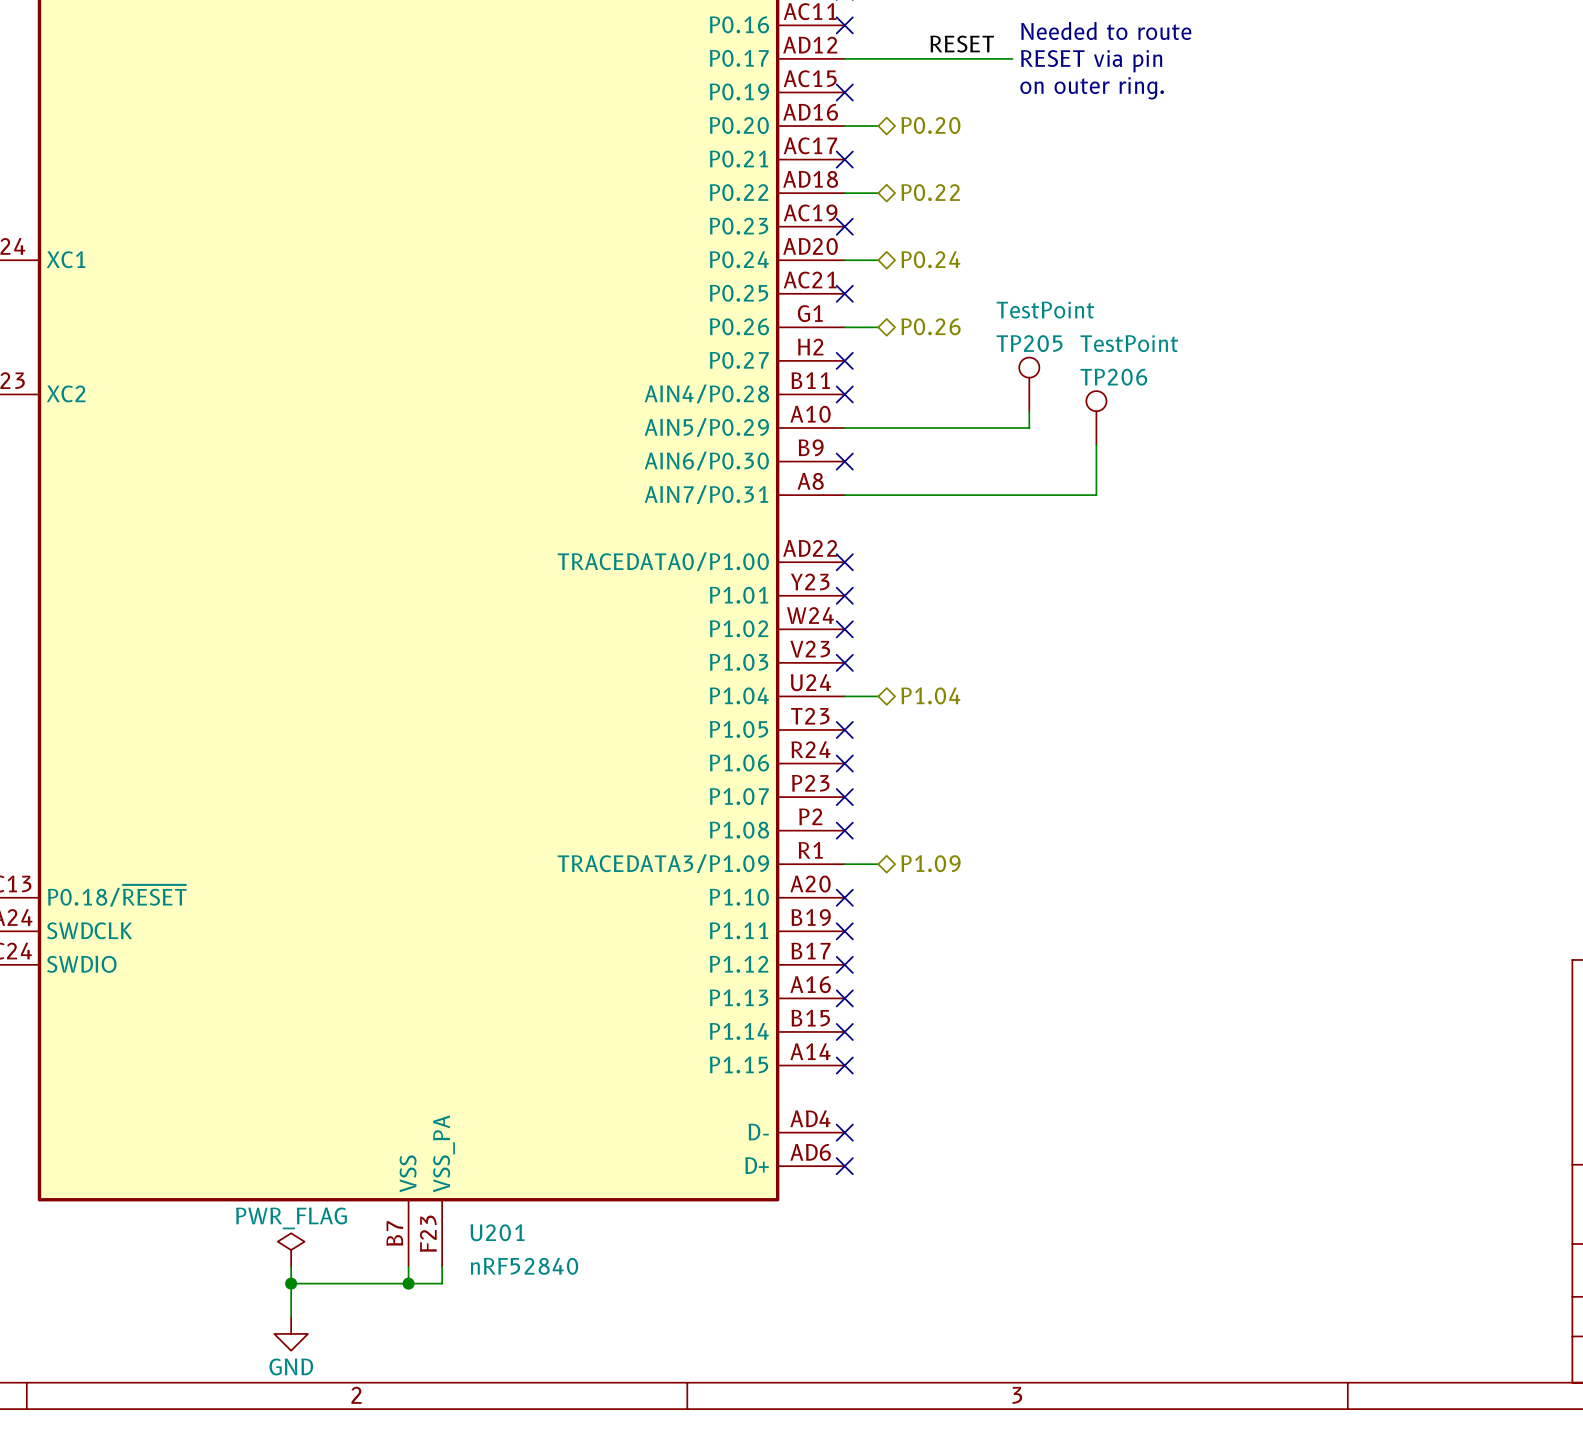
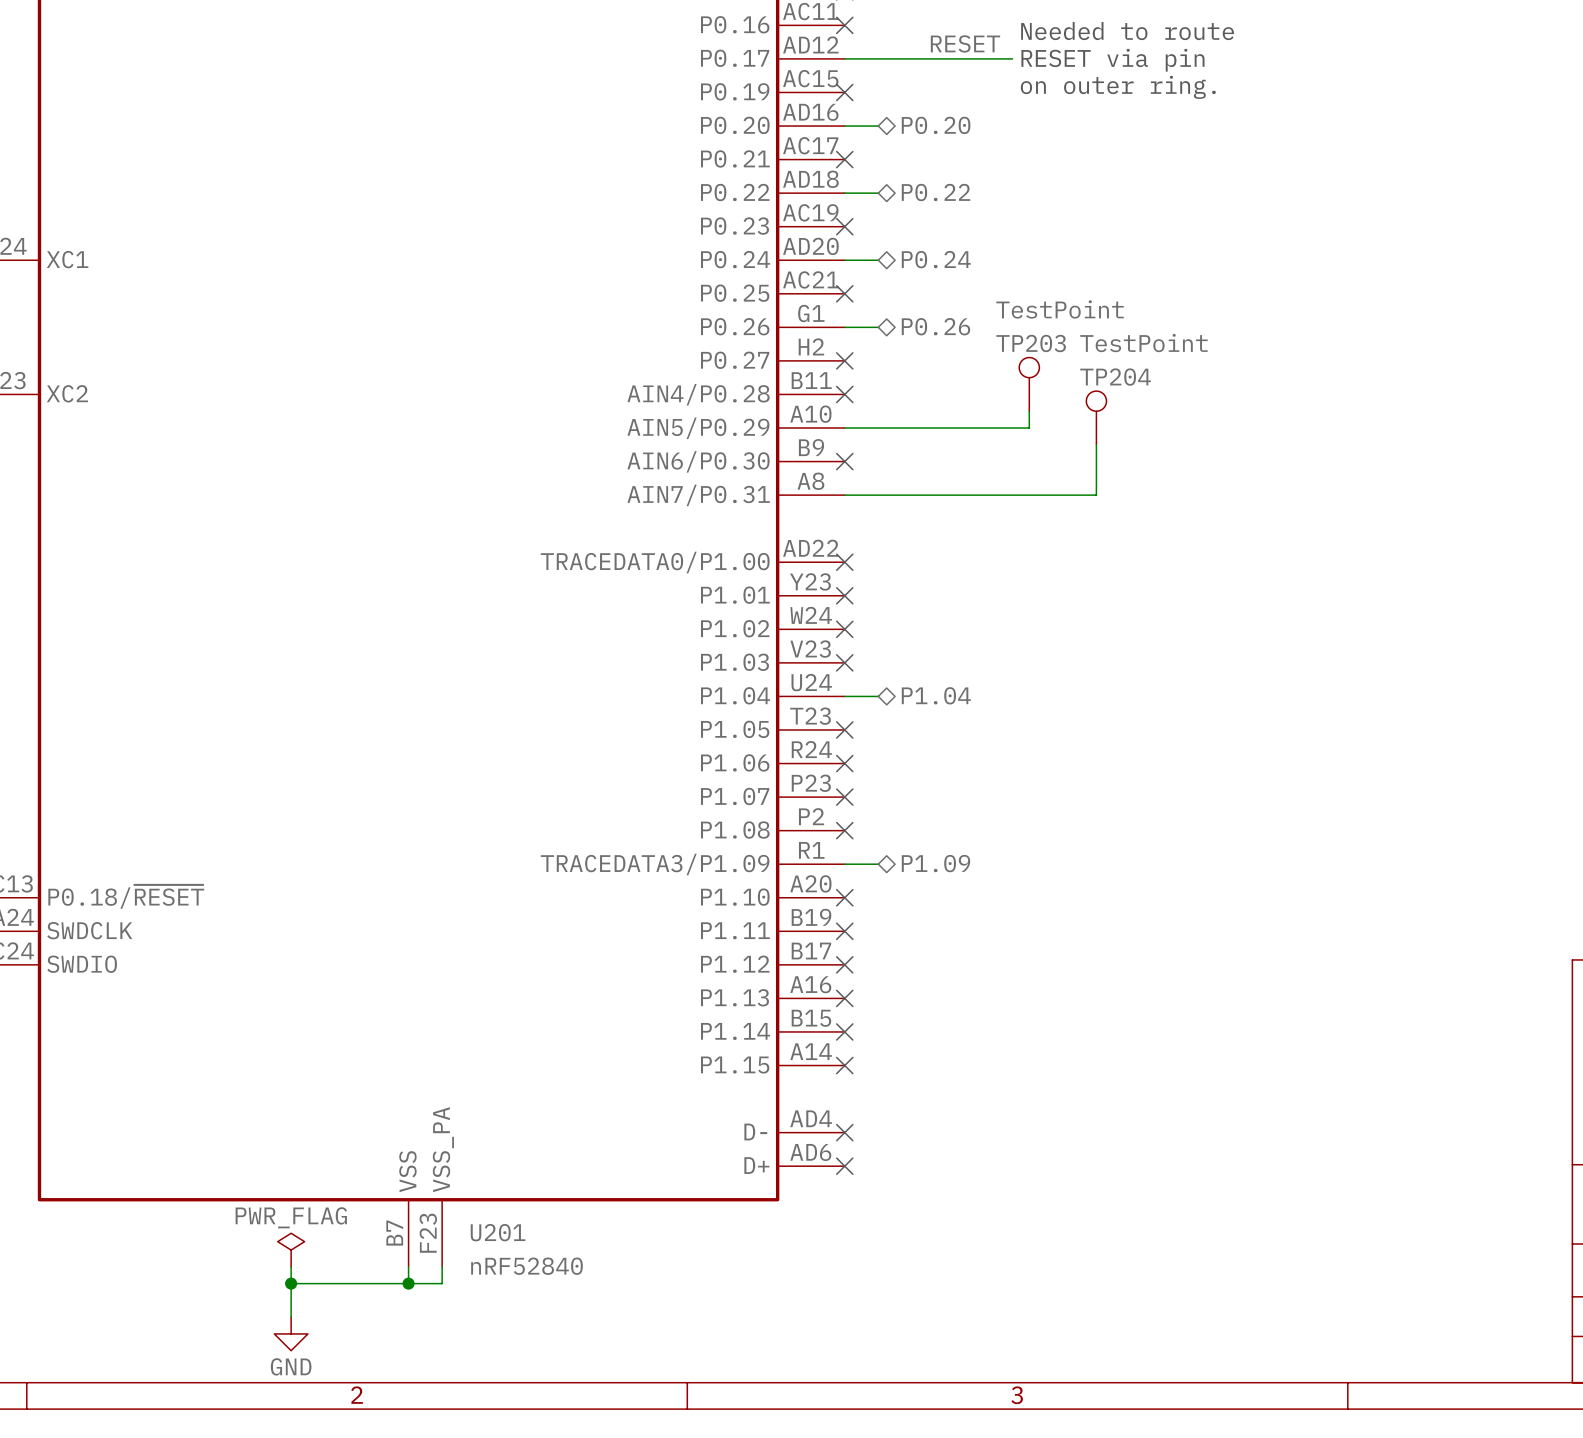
TP205 name: TP205 (1029, 343) -> TP203 (1031, 343)
TP206 name: TP206 (1113, 377) -> TP204 (1115, 377)

